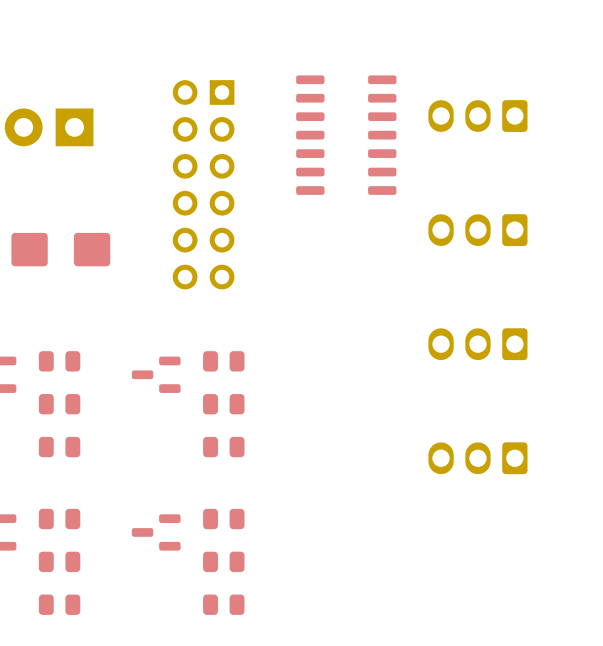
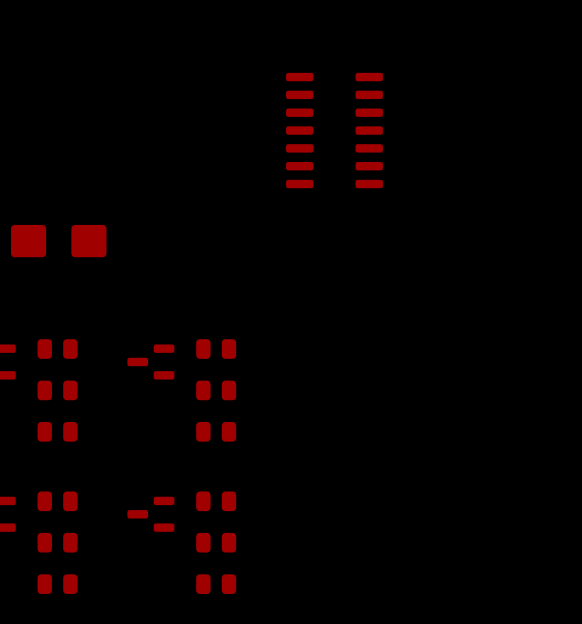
part: (477, 116) -> none
part: (49, 127) -> none
part: (203, 184) -> none
part: (477, 230) -> none
part: (477, 344) -> none
part: (477, 458) -> none

